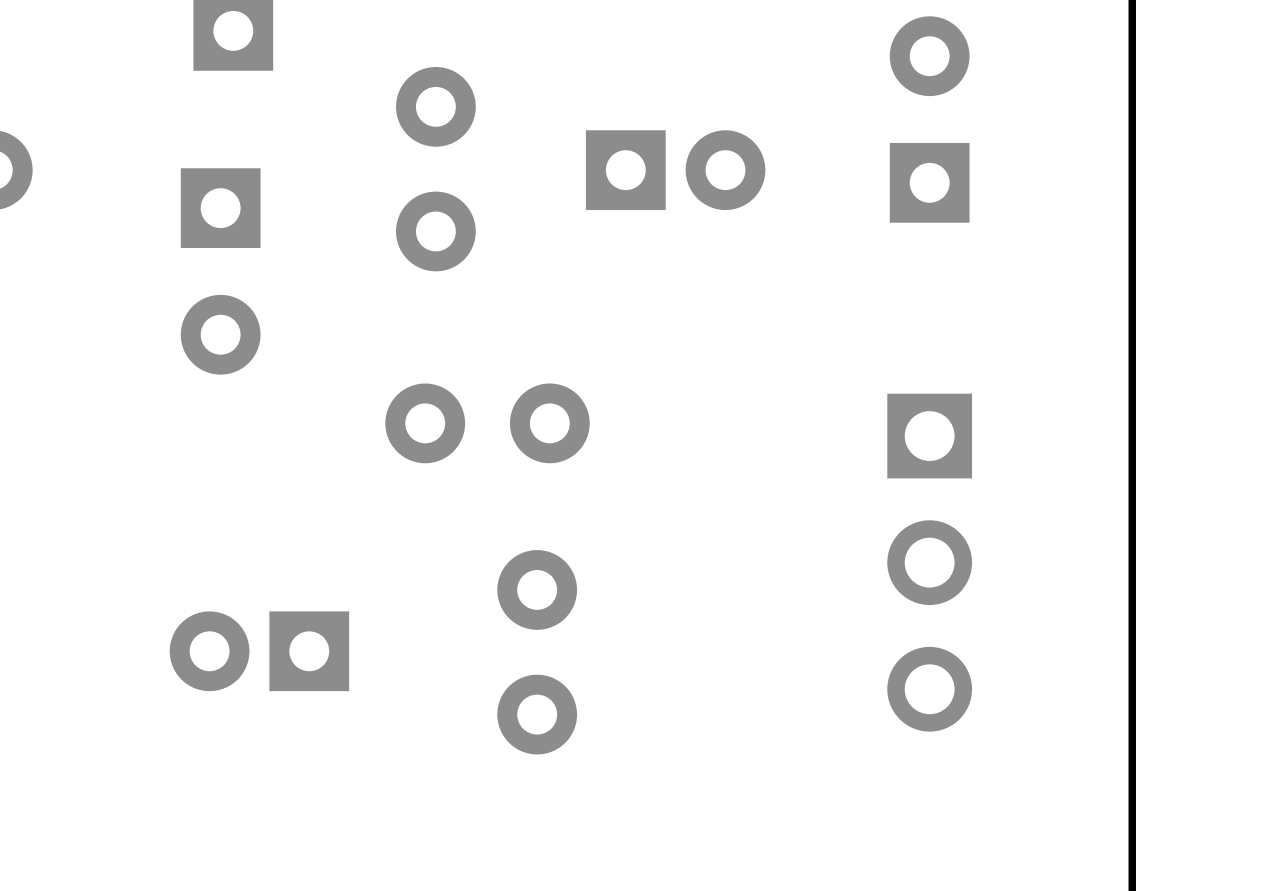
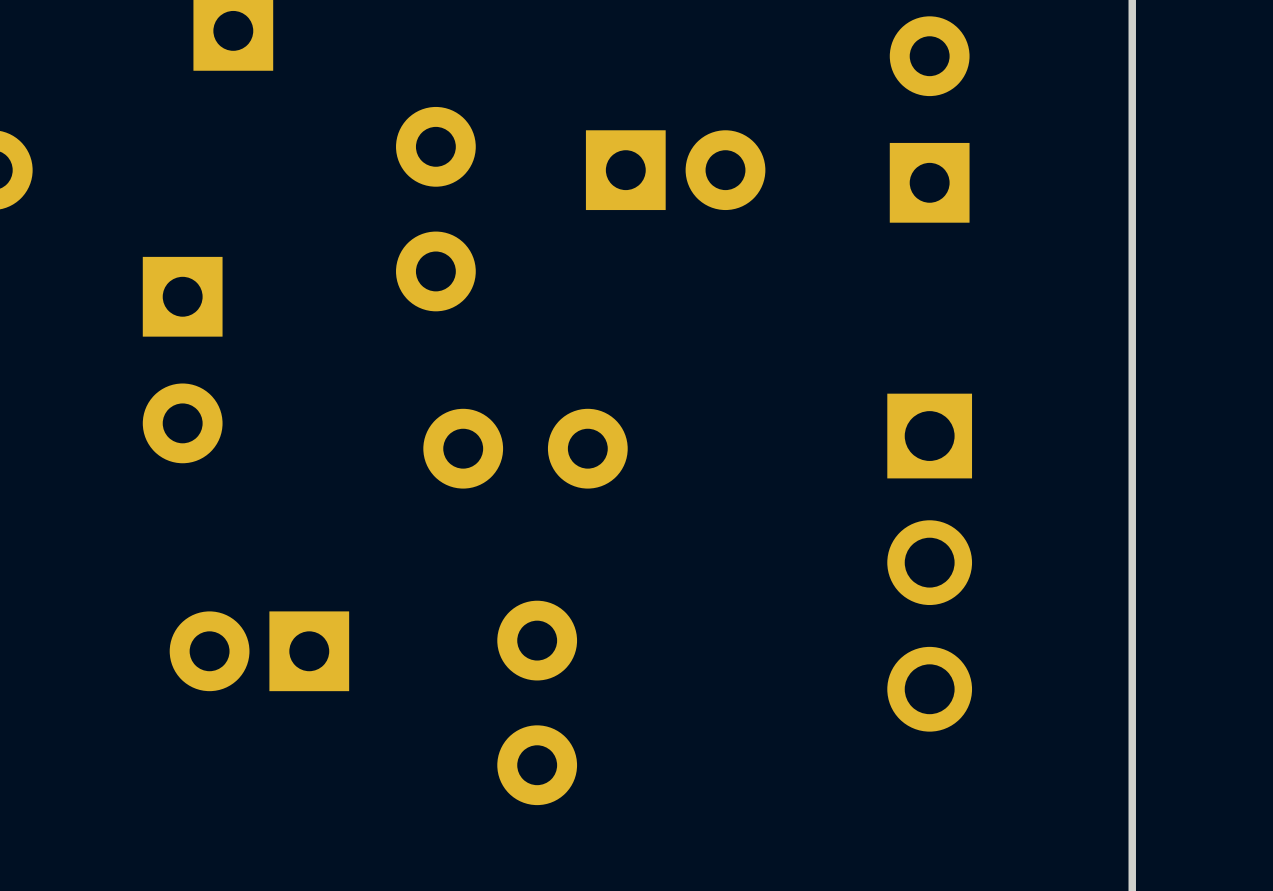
part position: (435, 169) -> (435, 209)
part position: (220, 271) -> (182, 360)
part position: (487, 423) -> (525, 448)
part position: (537, 652) -> (537, 702)

